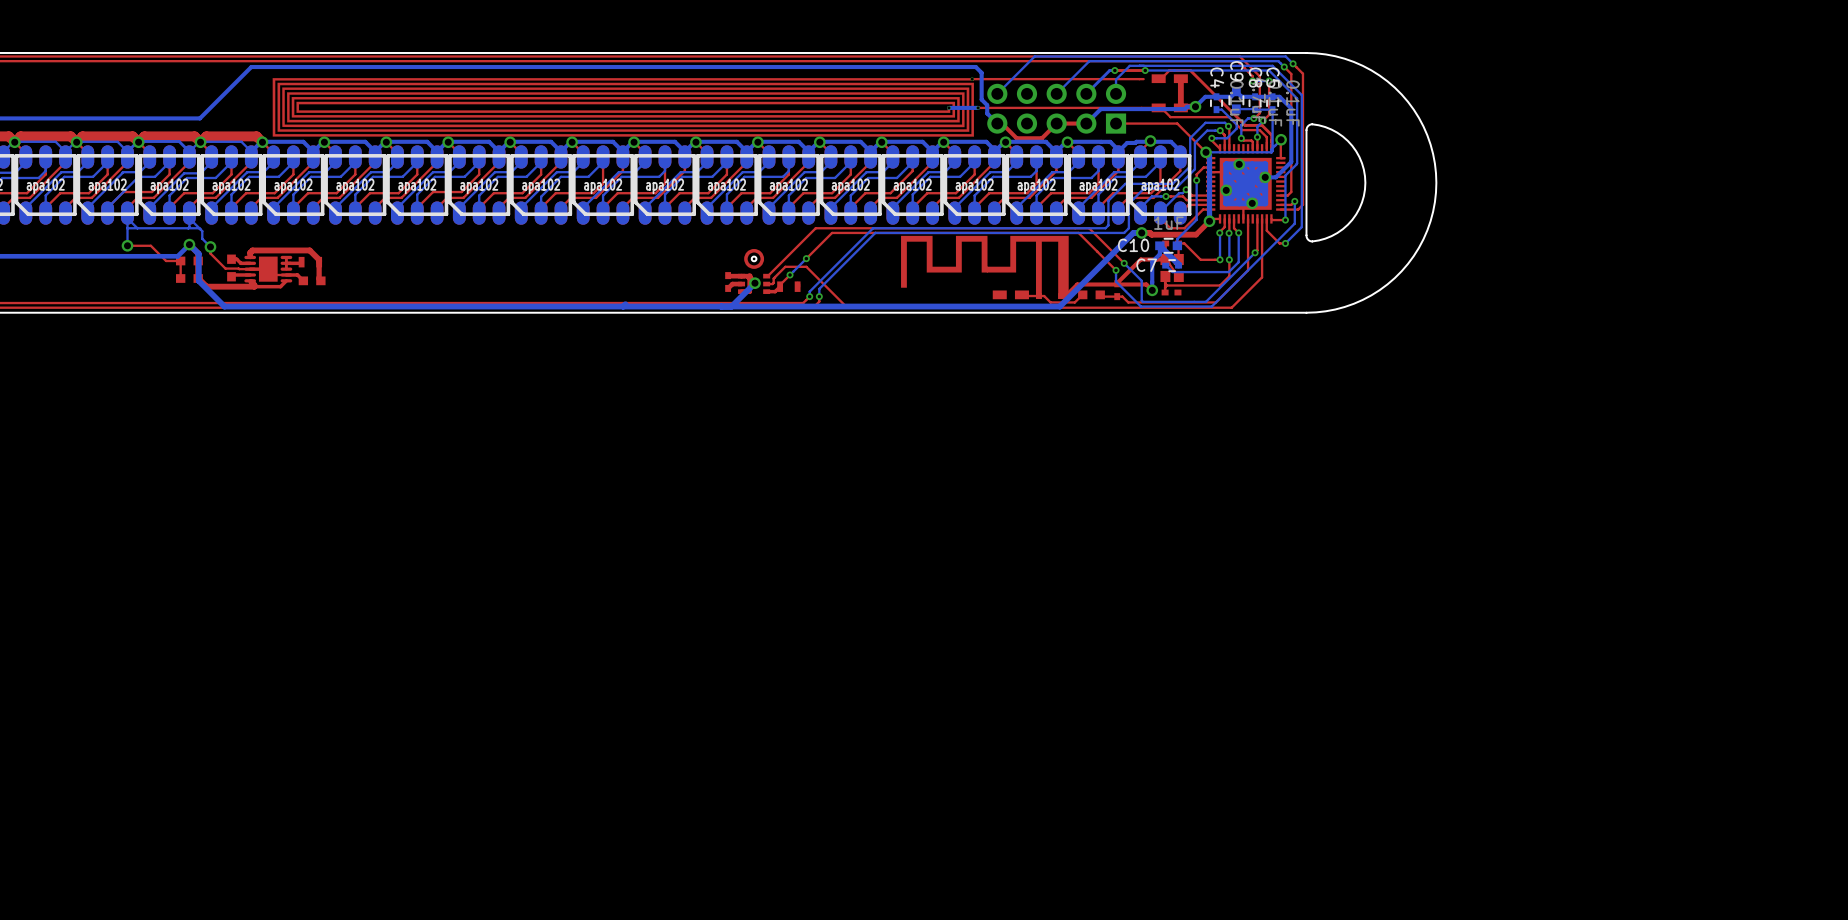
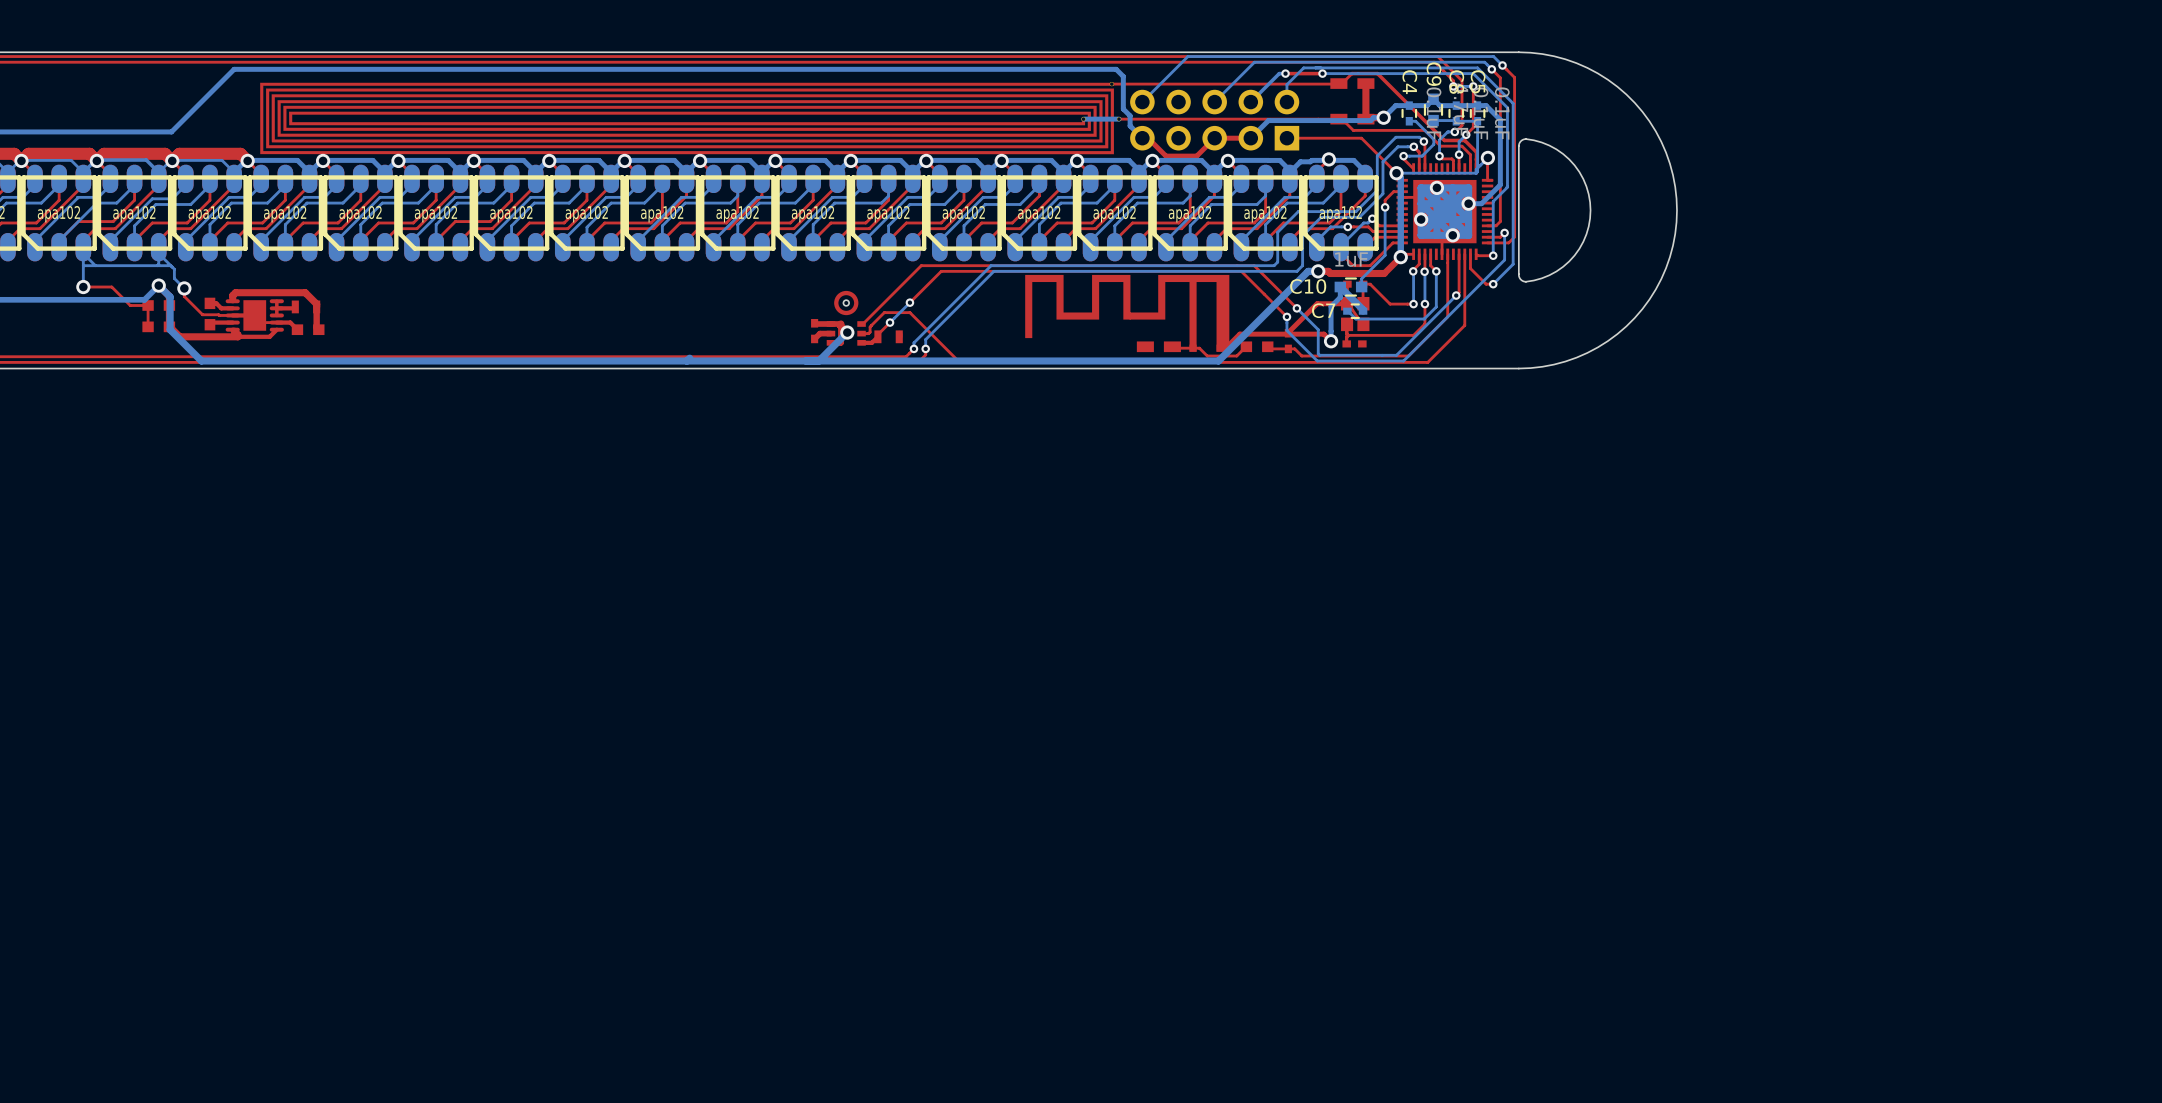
top track: none -> (1338, 83) (1320, 84)

